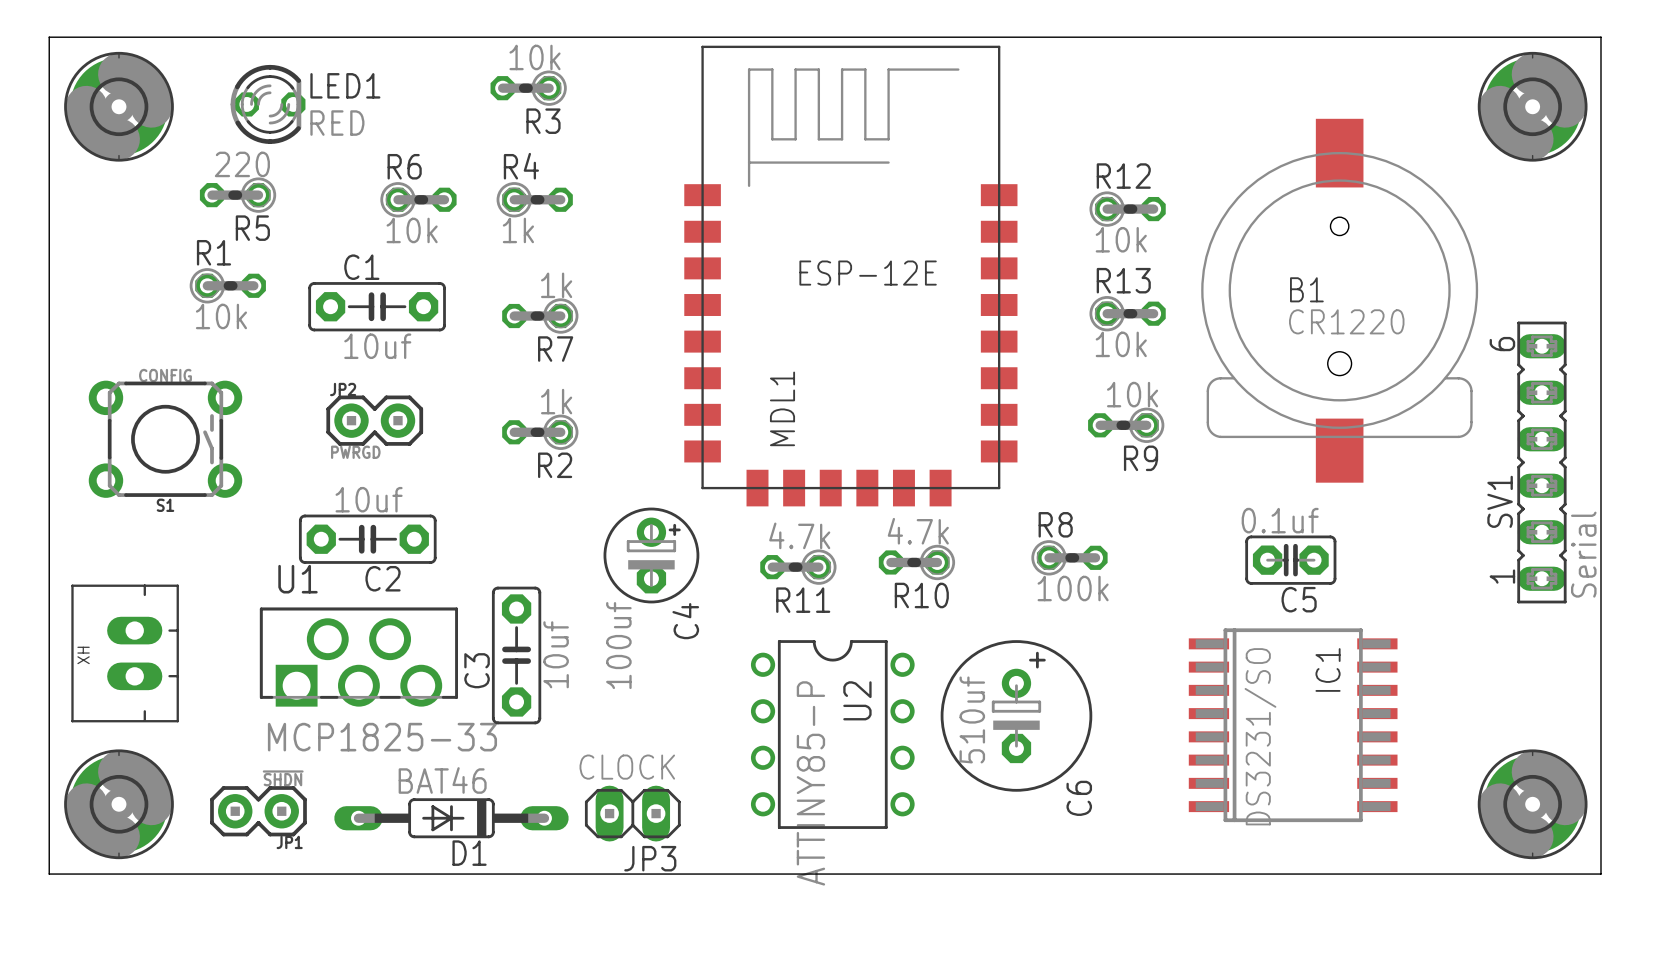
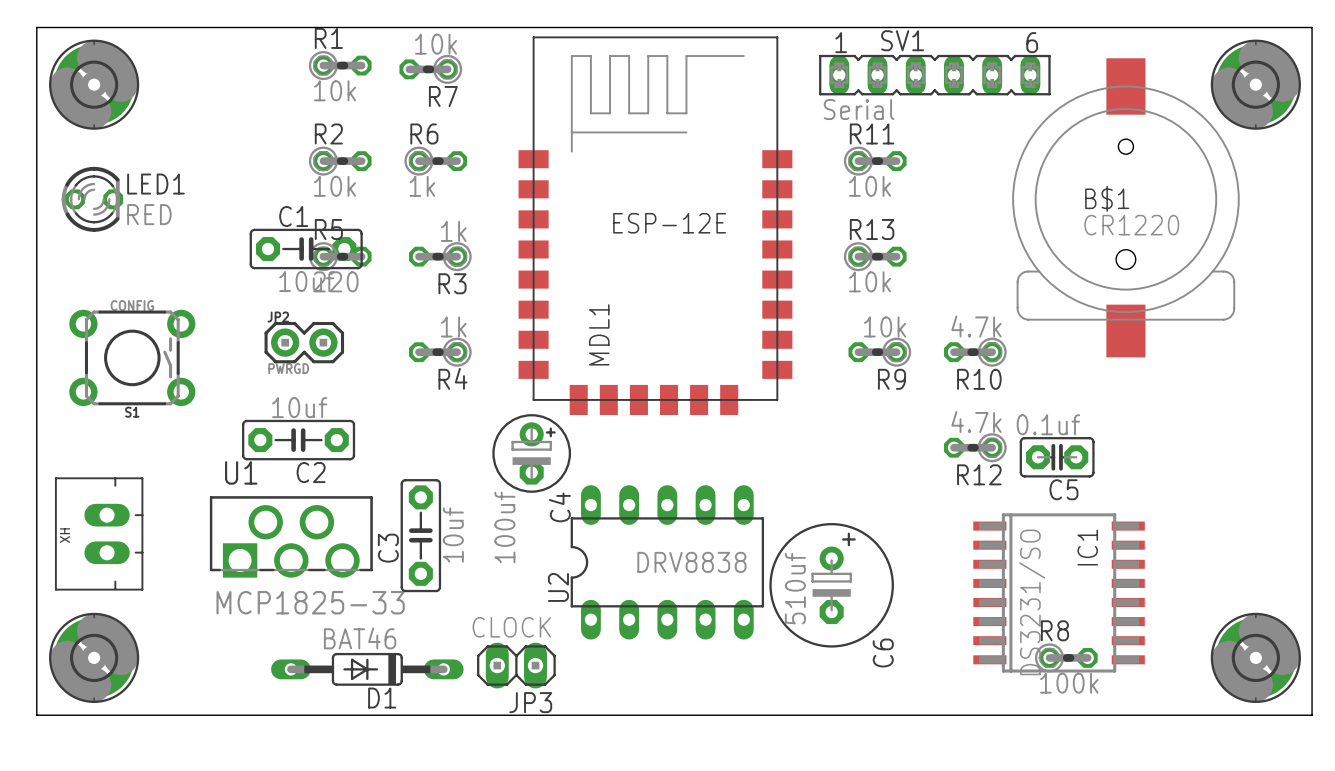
LED1 position: (268, 104) -> (92, 199)
R3 name: R3 (543, 121) -> R7 (443, 96)
R6 name: R6 (404, 166) -> R2 (328, 133)
R4 name: R4 (521, 166) -> R6 (424, 133)
R5 rotation: 0° (238, 195) -> 180° (340, 256)
R5 position: (238, 195) -> (340, 256)
R12 rotation: 0° (1127, 209) -> 180° (975, 447)
R12 position: (1127, 209) -> (975, 447)
R12 value: 10k (1121, 239) -> 4.7k (976, 422)
B$1: none -> CR1220 (1125, 207)
MDL1 position: (850, 276) -> (655, 225)
R1 position: (227, 285) -> (340, 65)
B1: CR1220 (1339, 300) -> none
R13 position: (1127, 313) -> (875, 256)
R7 name: R7 (555, 349) -> R3 (452, 283)
R9 position: (1126, 425) -> (879, 352)
SV1 rotation: 0° (1541, 462) -> 90° clockwise (934, 75)
SV1 position: (1541, 462) -> (934, 75)
R2 name: R2 (555, 465) -> R4 (452, 378)
R11 value: 4.7k (799, 535) -> 10k (870, 186)
R8 position: (1069, 557) -> (1066, 657)
R10 position: (916, 562) -> (975, 352)
R11 rotation: 0° (798, 567) -> 180° (875, 161)
R11 position: (798, 567) -> (875, 161)
U2 footprint: [750, 640, 915, 829] -> [570, 485, 765, 640]
U2 name position: U2 (857, 700) -> U2 (558, 587)
U2 value: ATTINY85-P (810, 783) -> DRV8838 (691, 562)
JP1: ~{SHDN} (258, 811) -> none

